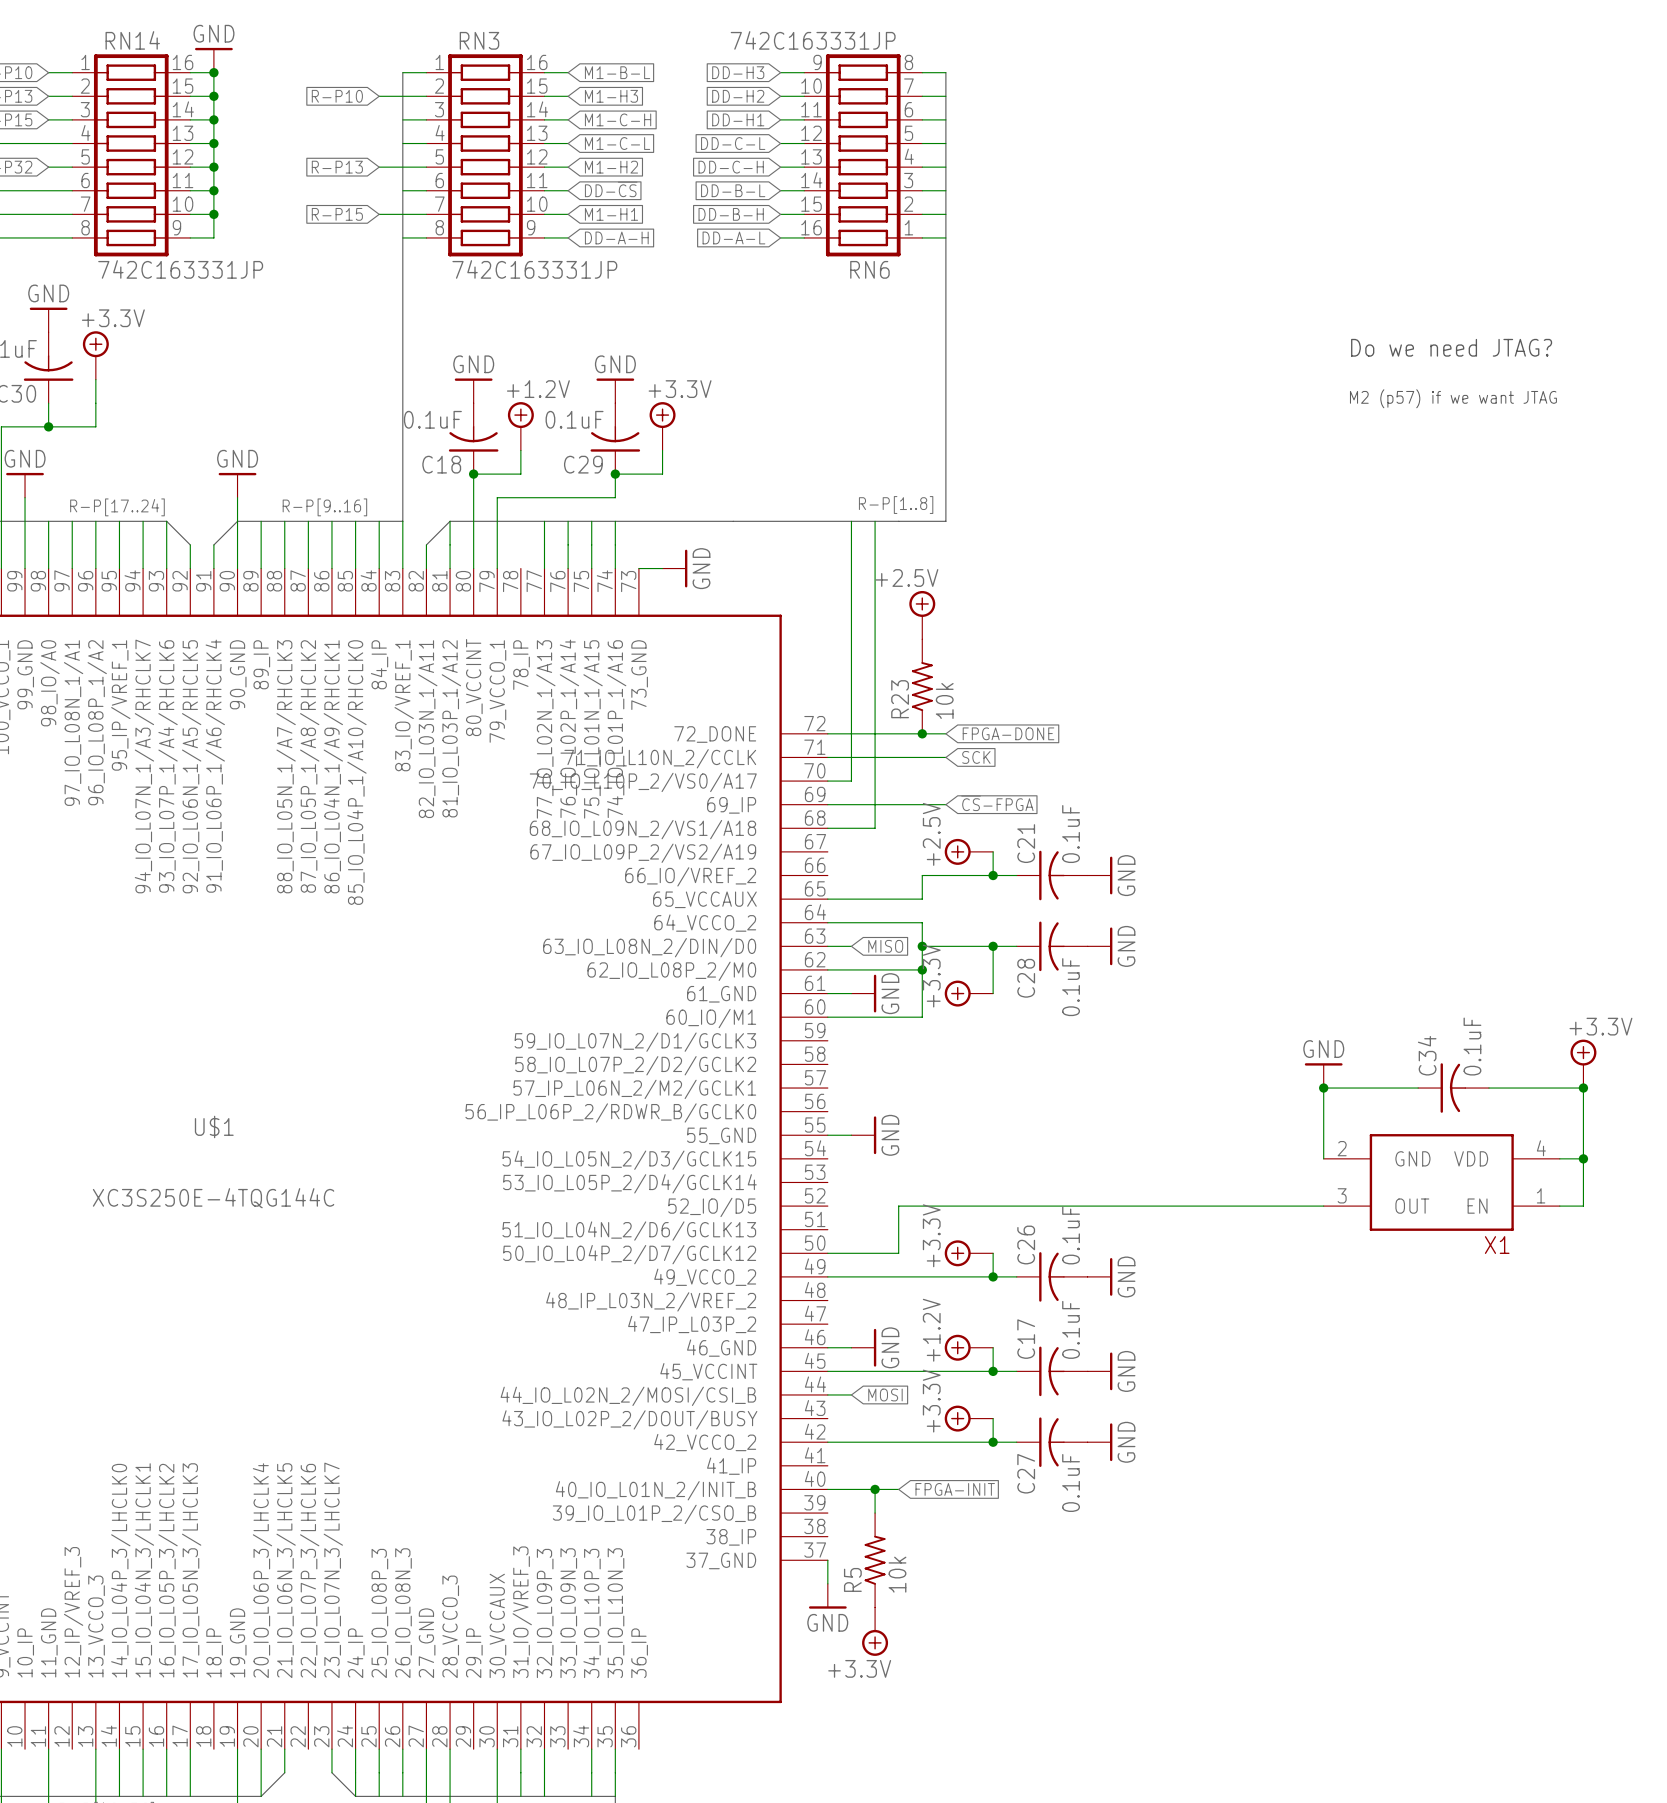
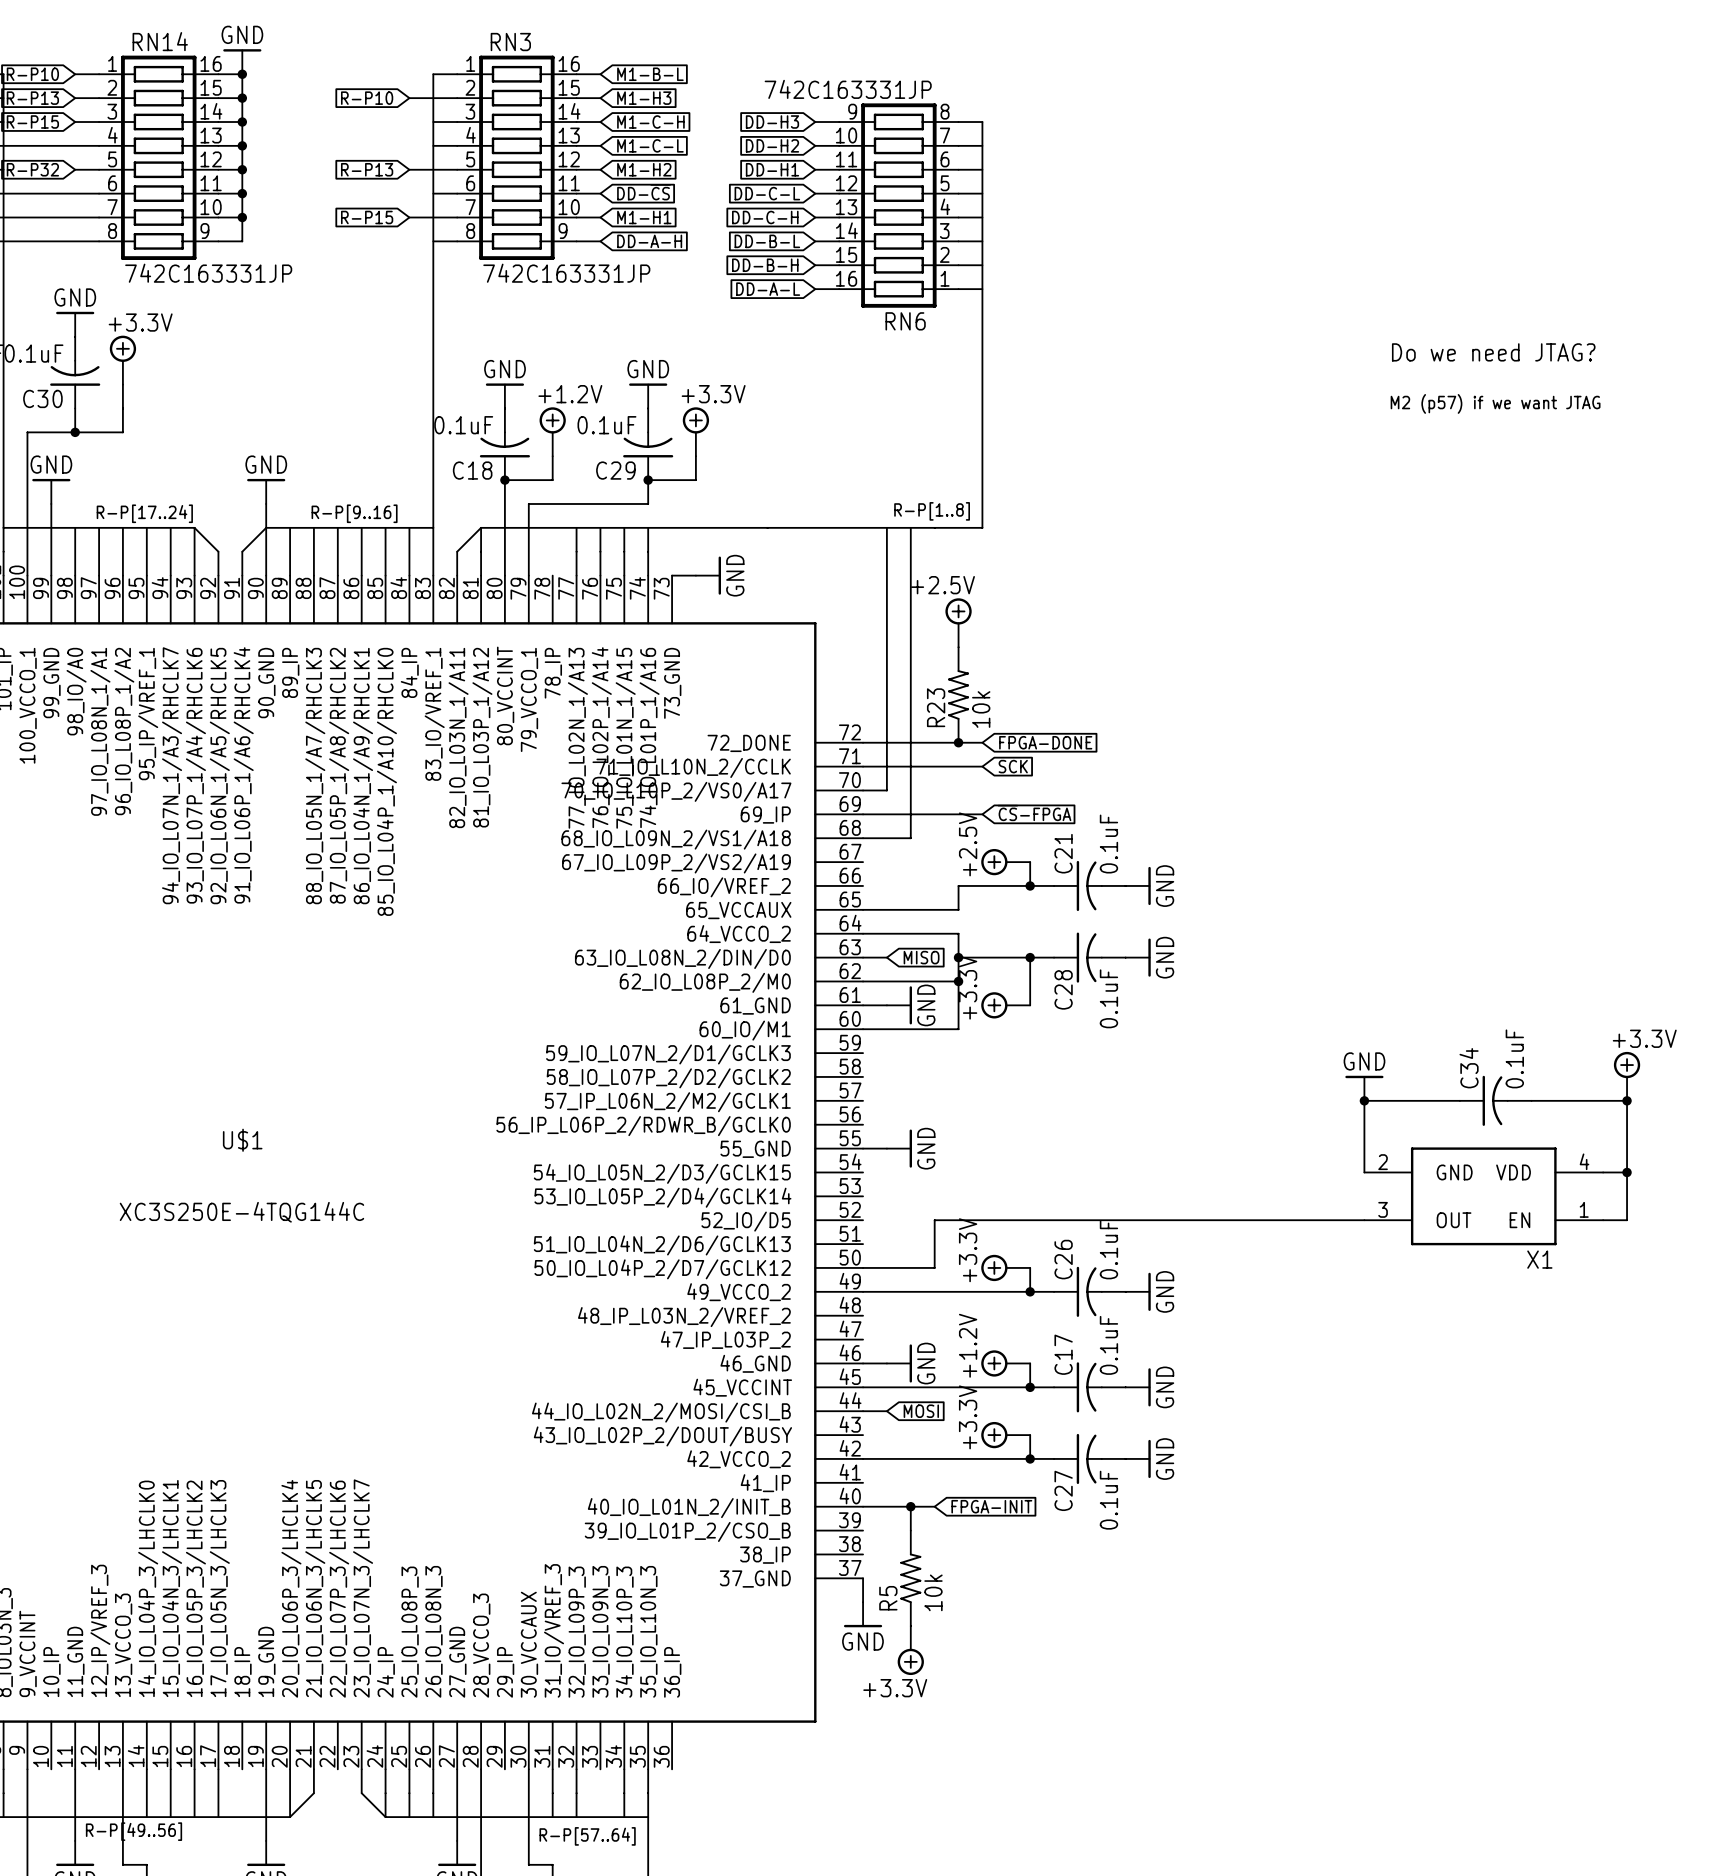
global label: DD-H3 (738, 72) -> none
wire: (780, 72) (804, 72) -> (815, 265) (839, 265)
wire: (922, 72) (945, 72) -> (958, 265) (982, 265)
bus: (945, 72) (945, 119) -> none
global label: DD-H2 (738, 96) -> none
wire: (780, 96) (804, 96) -> (815, 289) (839, 289)
wire: (922, 96) (945, 96) -> (958, 289) (982, 289)
global label: DD-H1 (738, 119) -> DD-H3 (772, 122)
global label: DD-C-L (733, 143) -> DD-H2 (772, 145)
RN6 position: (863, 155) -> (898, 205)
global label: DD-C-H (731, 167) -> DD-H1 (772, 169)
global label: DD-B-L (733, 190) -> DD-C-L (767, 193)
global label: DD-B-H (731, 214) -> DD-C-H (765, 217)
global label: DD-A-L (733, 237) -> DD-B-L (767, 241)
global label: none -> DD-B-H (765, 265)
global label: none -> DD-A-L (768, 289)

